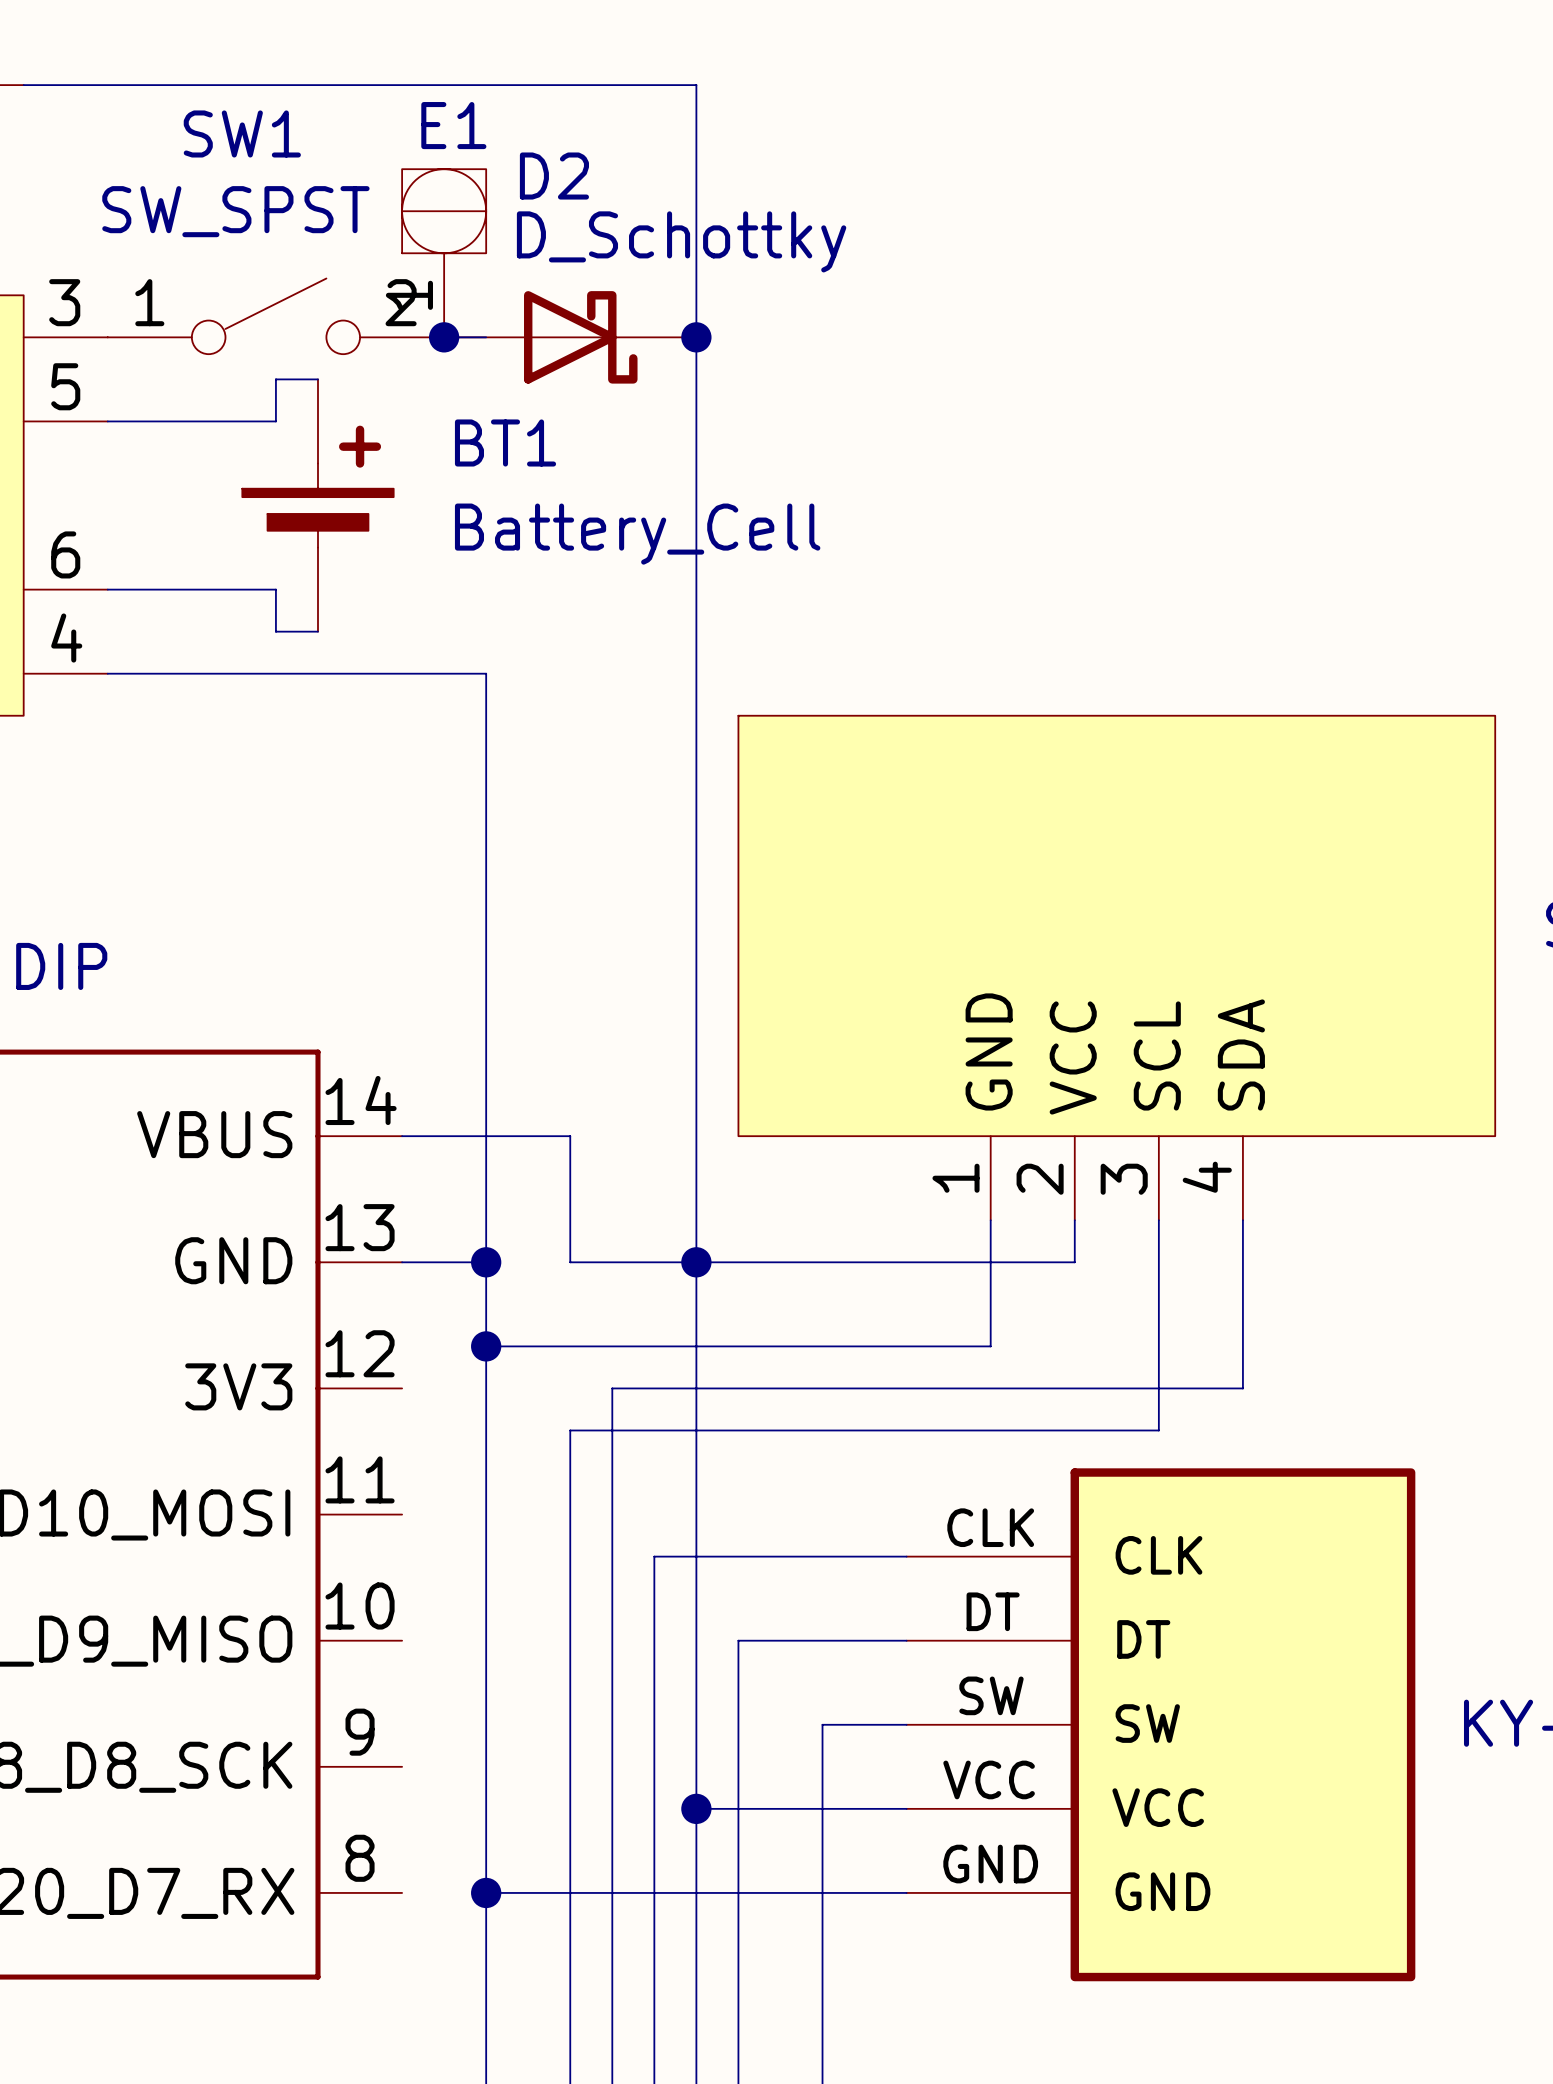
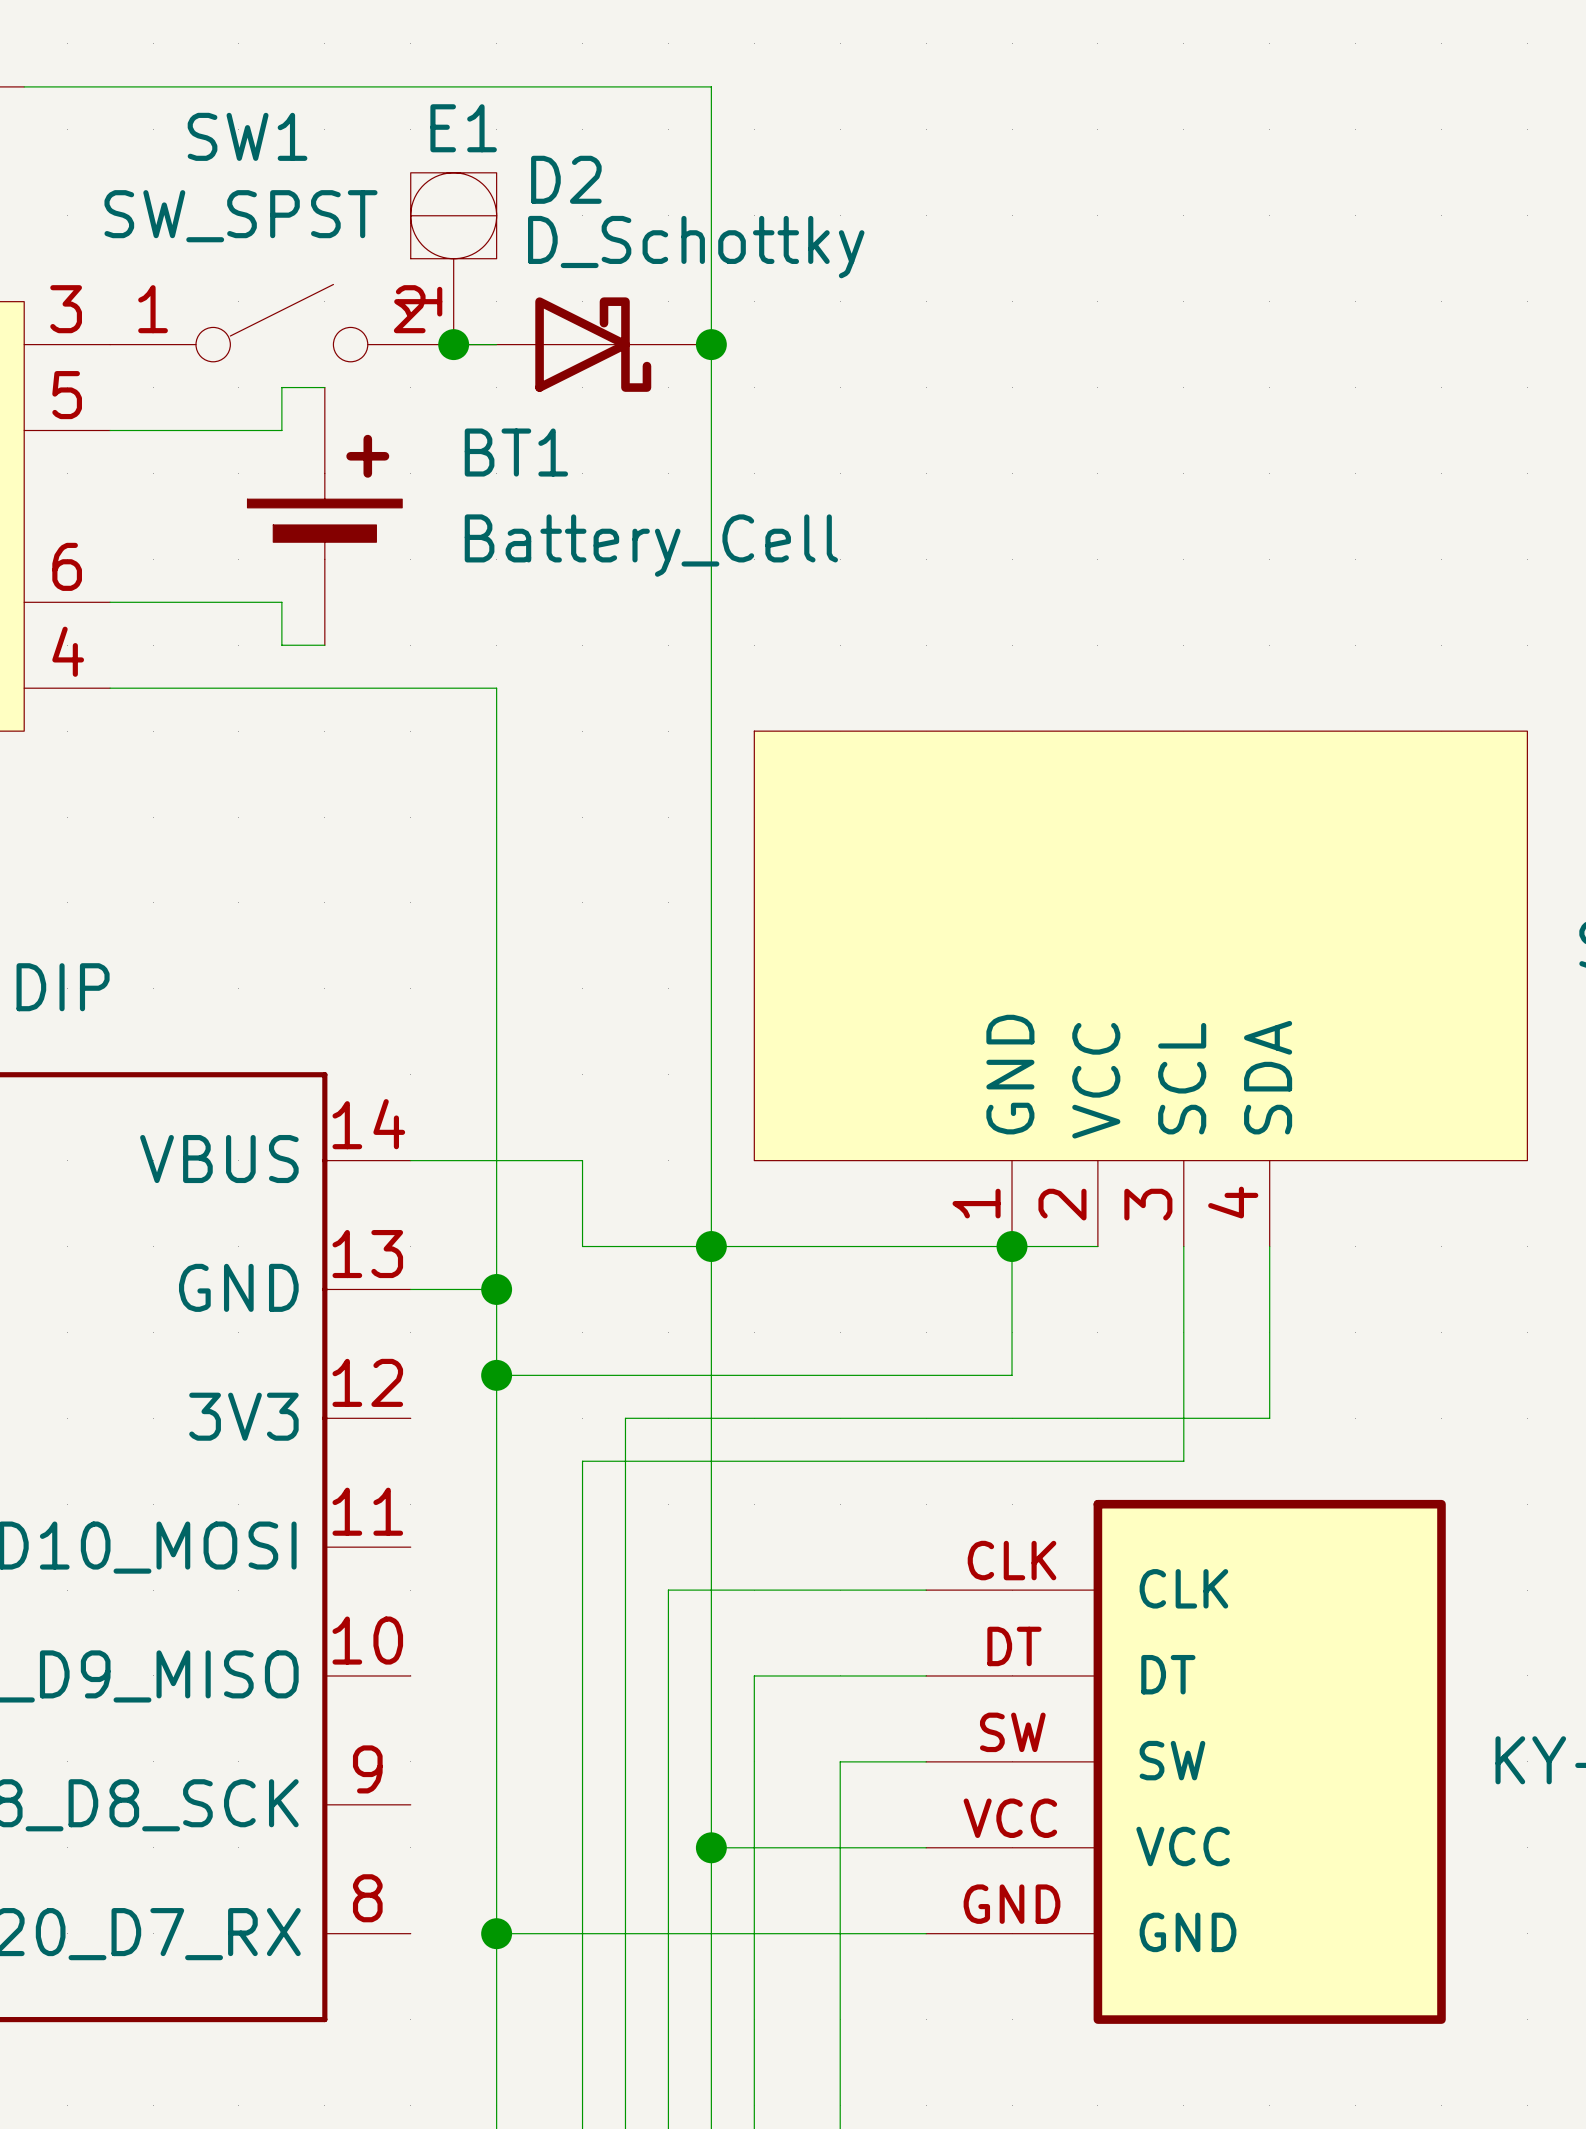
wire: (570, 1220) (570, 1262) (1074, 1262) (1074, 1220) -> (582, 1246) (1097, 1246)
junction: none -> (1012, 1246)
junction position: (696, 1262) -> (711, 1246)

